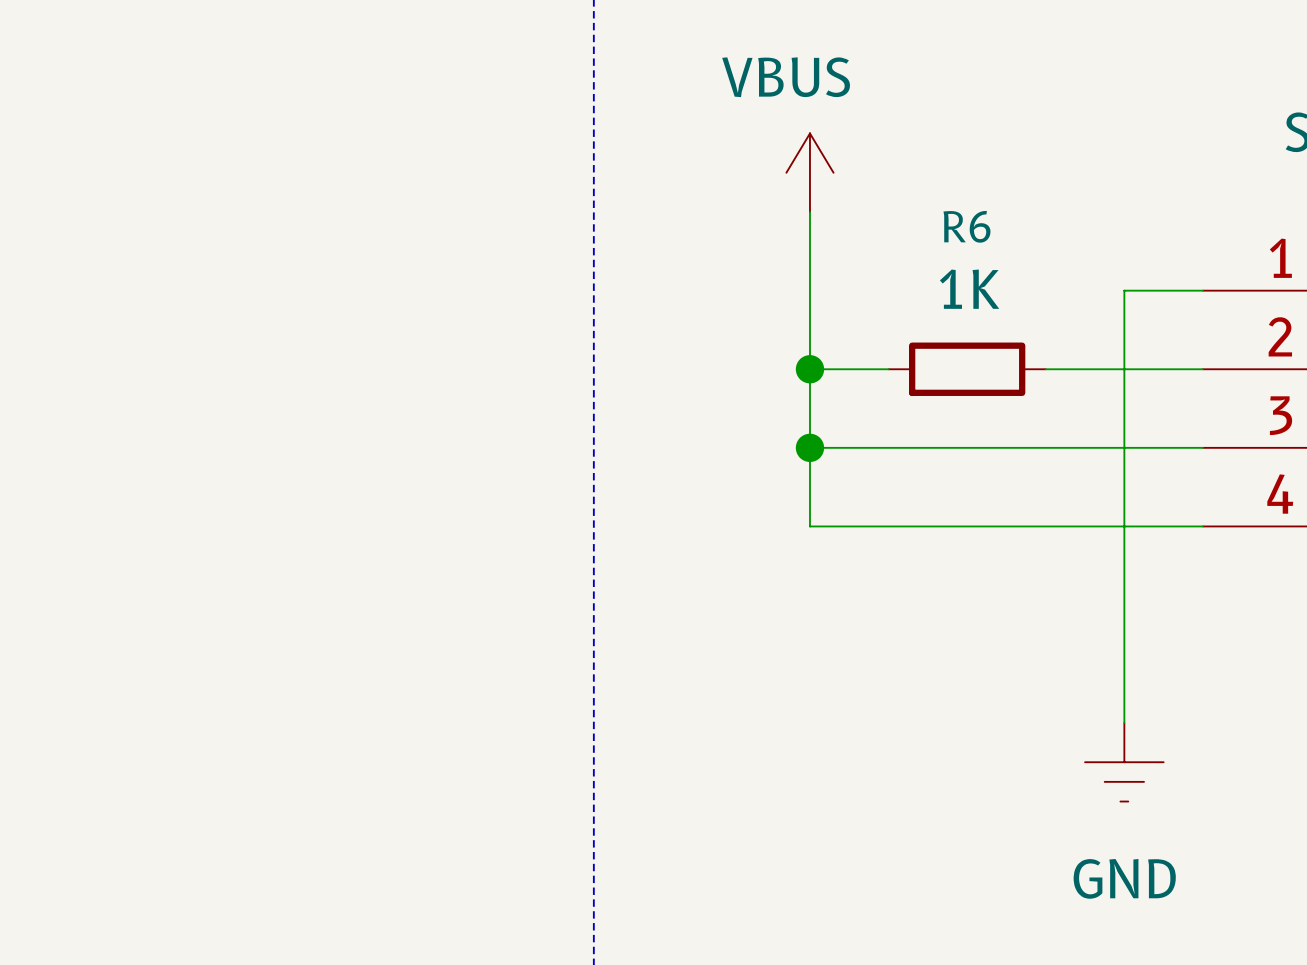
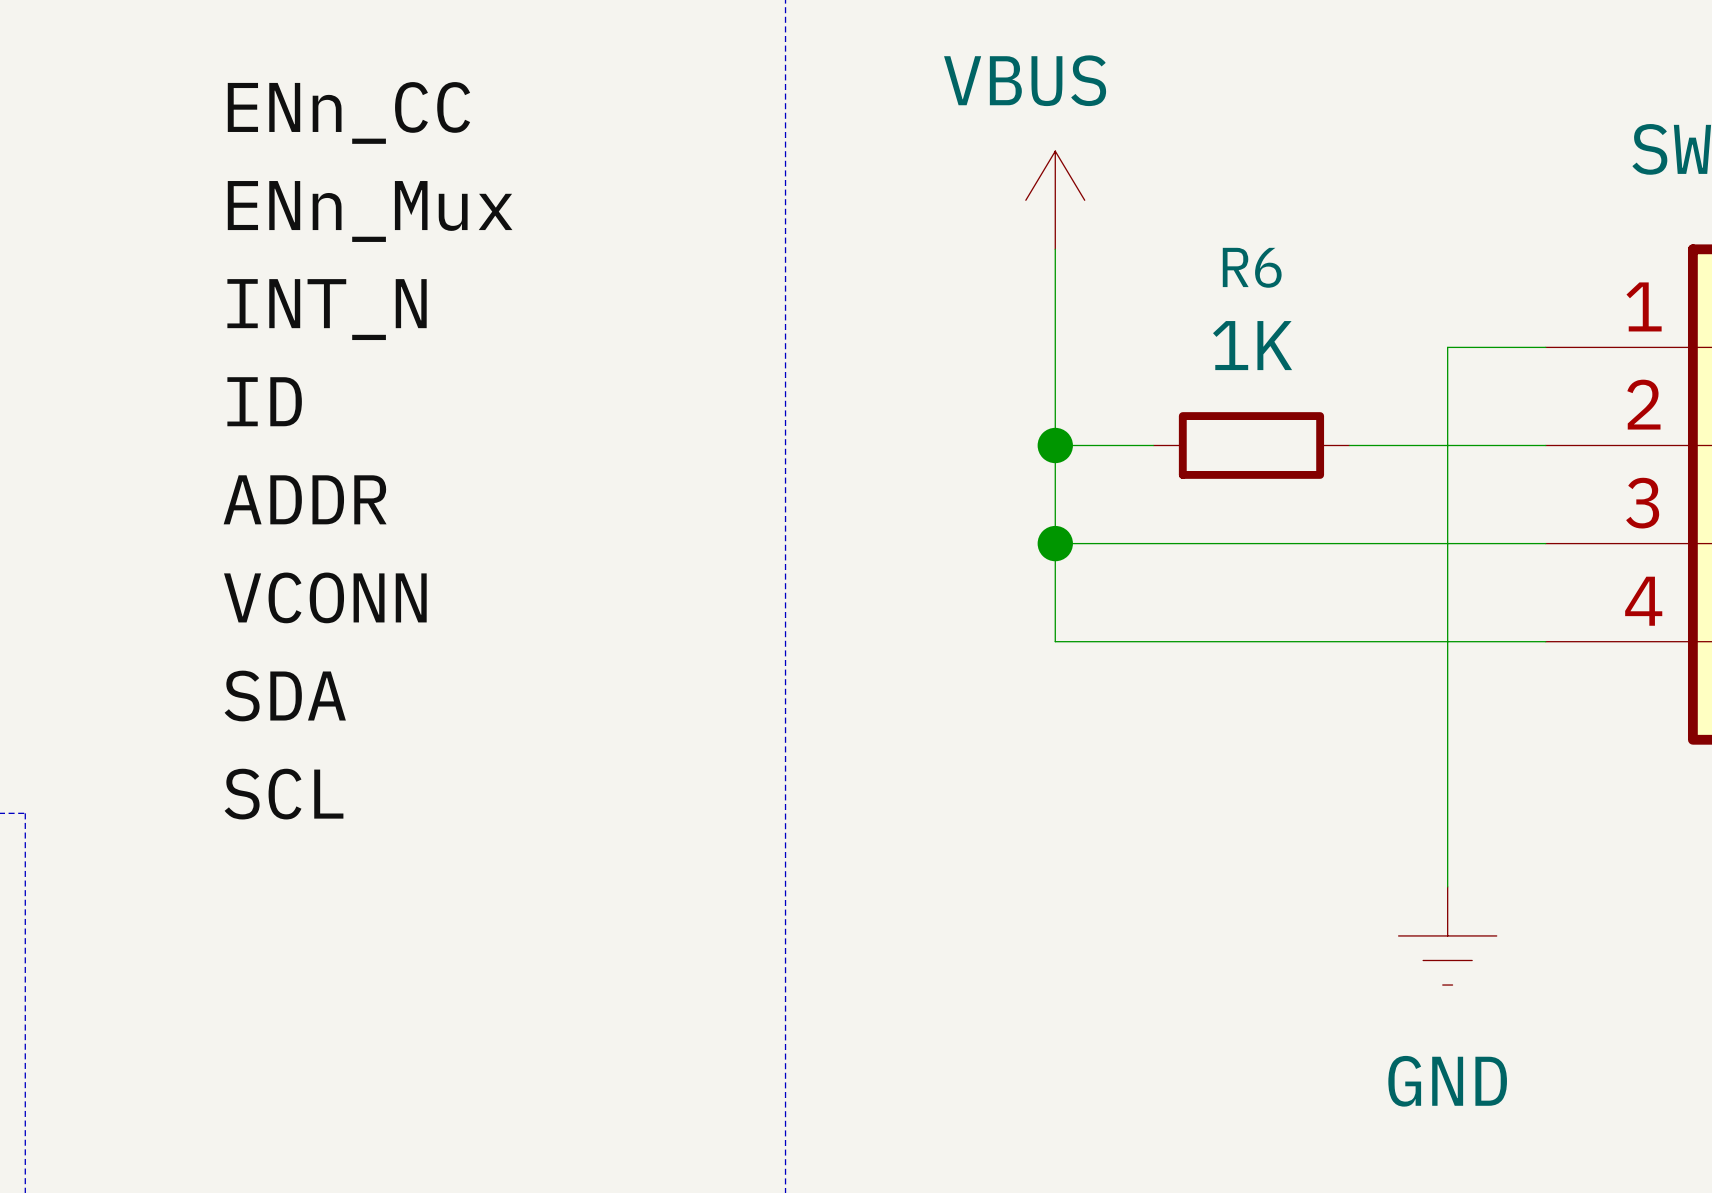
label: none -> ENn_CC (348, 112)
label: none -> ENn_Mux (370, 211)
label: none -> INT_N (327, 309)
label: none -> ID (264, 401)
label: none -> ADDR (305, 499)
label: none -> VCONN (325, 597)
label: none -> SDA (285, 696)
label: none -> SCL (284, 794)

